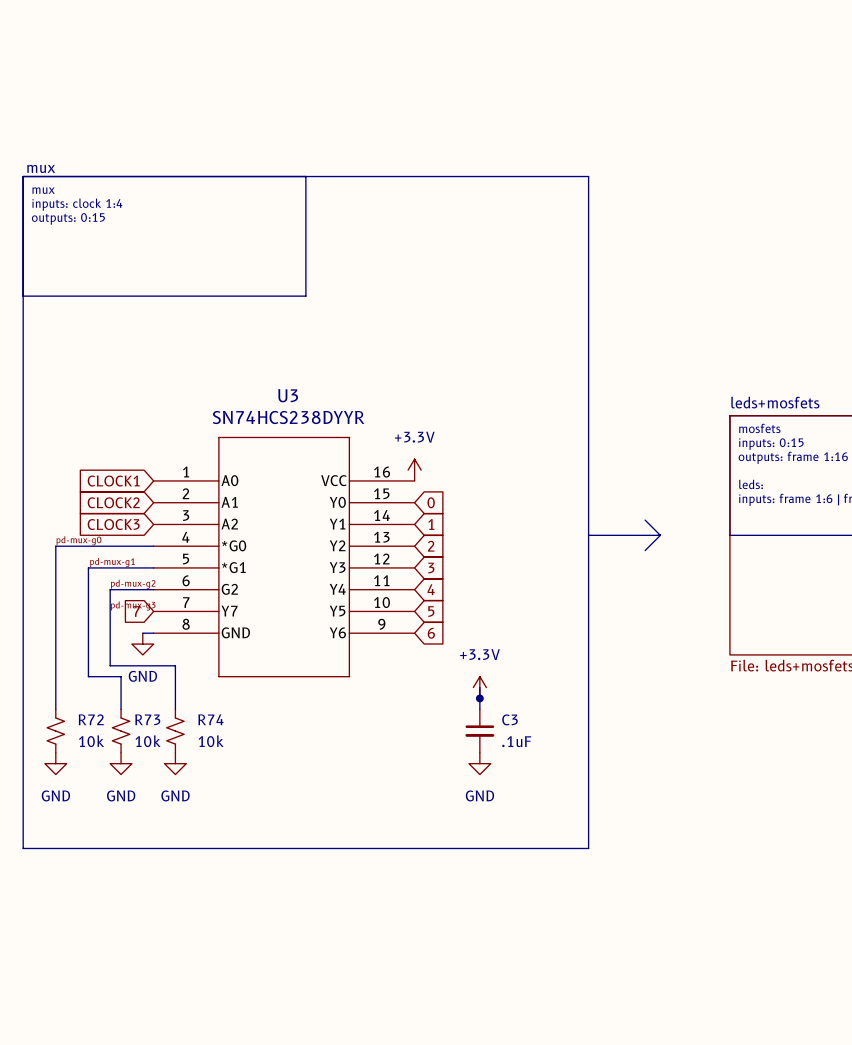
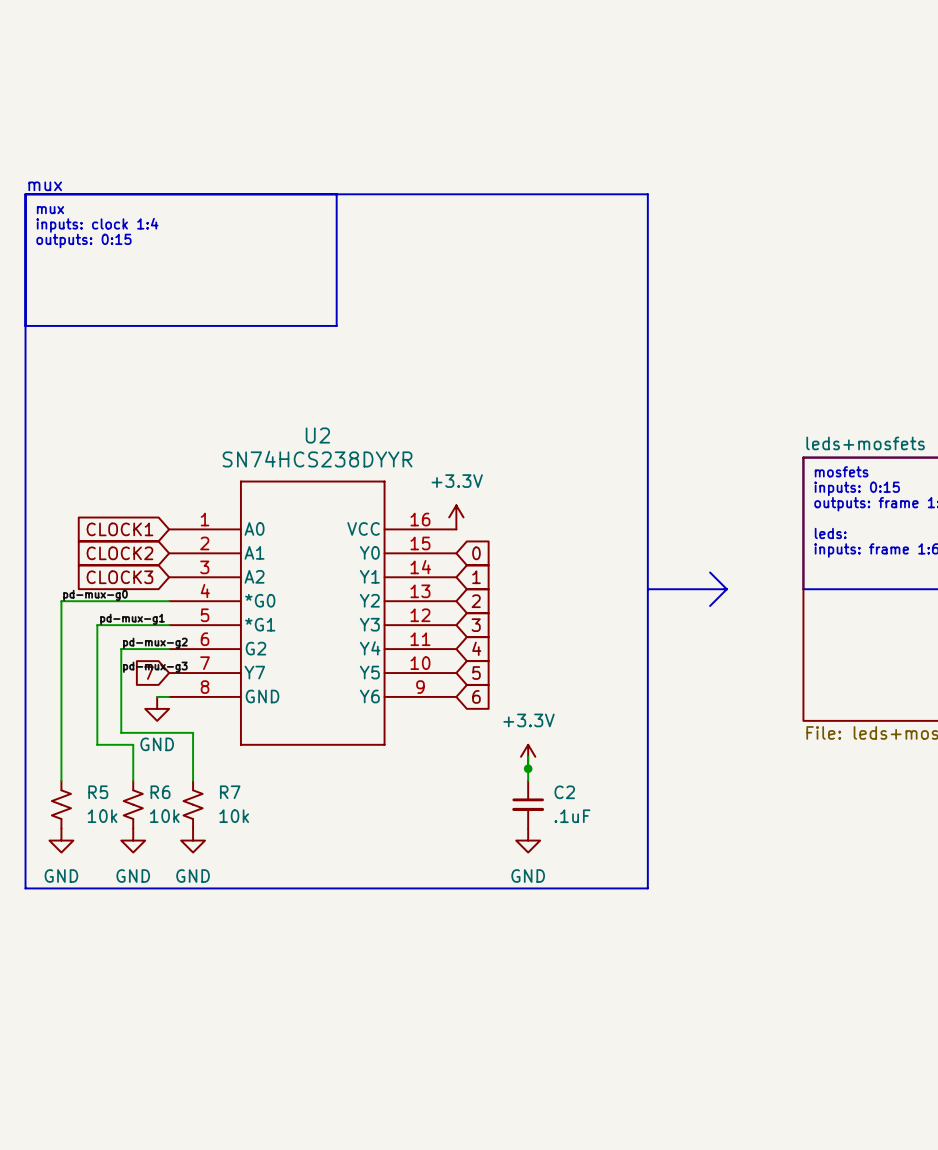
U3 name: U3 (288, 395) -> U2 (317, 435)
R72 name: R72 (91, 719) -> R5 (98, 792)
R73 name: R73 (147, 719) -> R6 (160, 792)
R74 name: R74 (210, 719) -> R7 (230, 792)
C3 name: C3 (510, 719) -> C2 (564, 792)
line: (23, 807) (23, 848) (588, 848) (588, 807) -> (25, 888) (647, 888)

